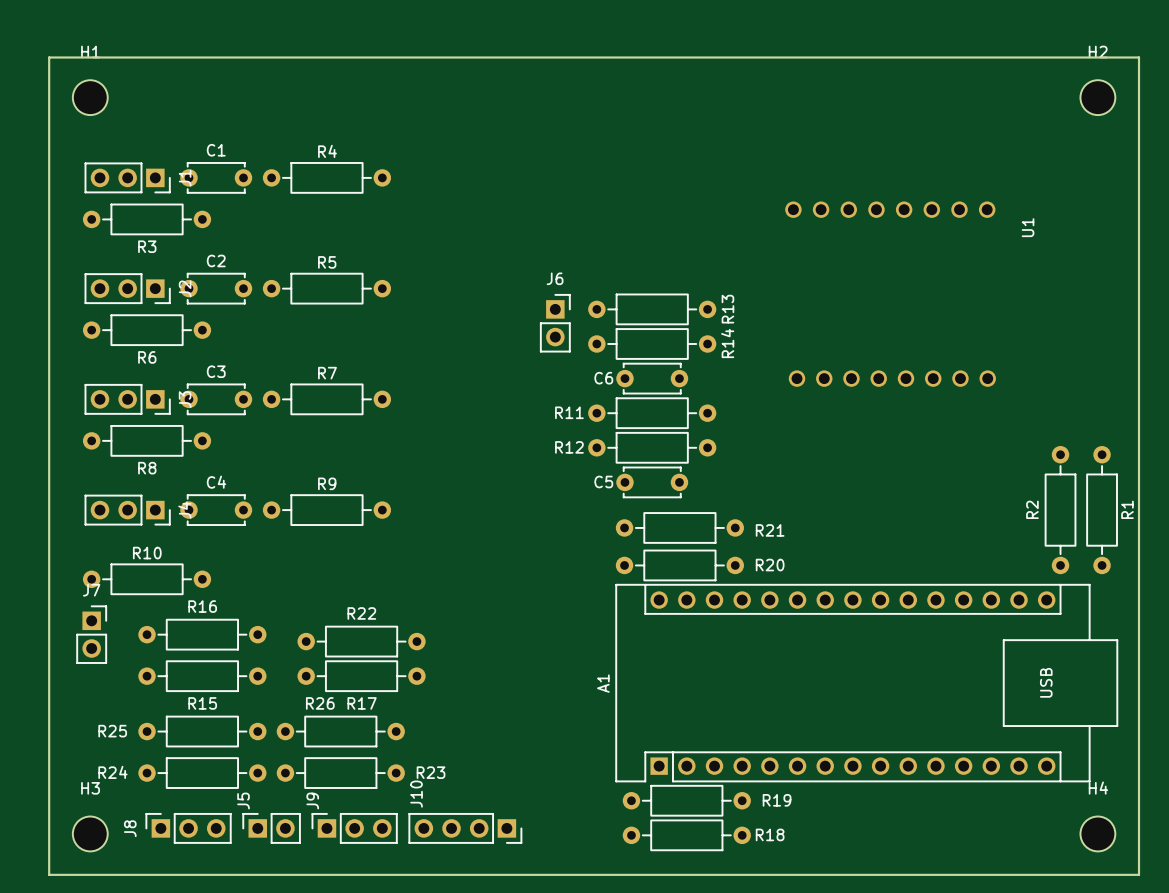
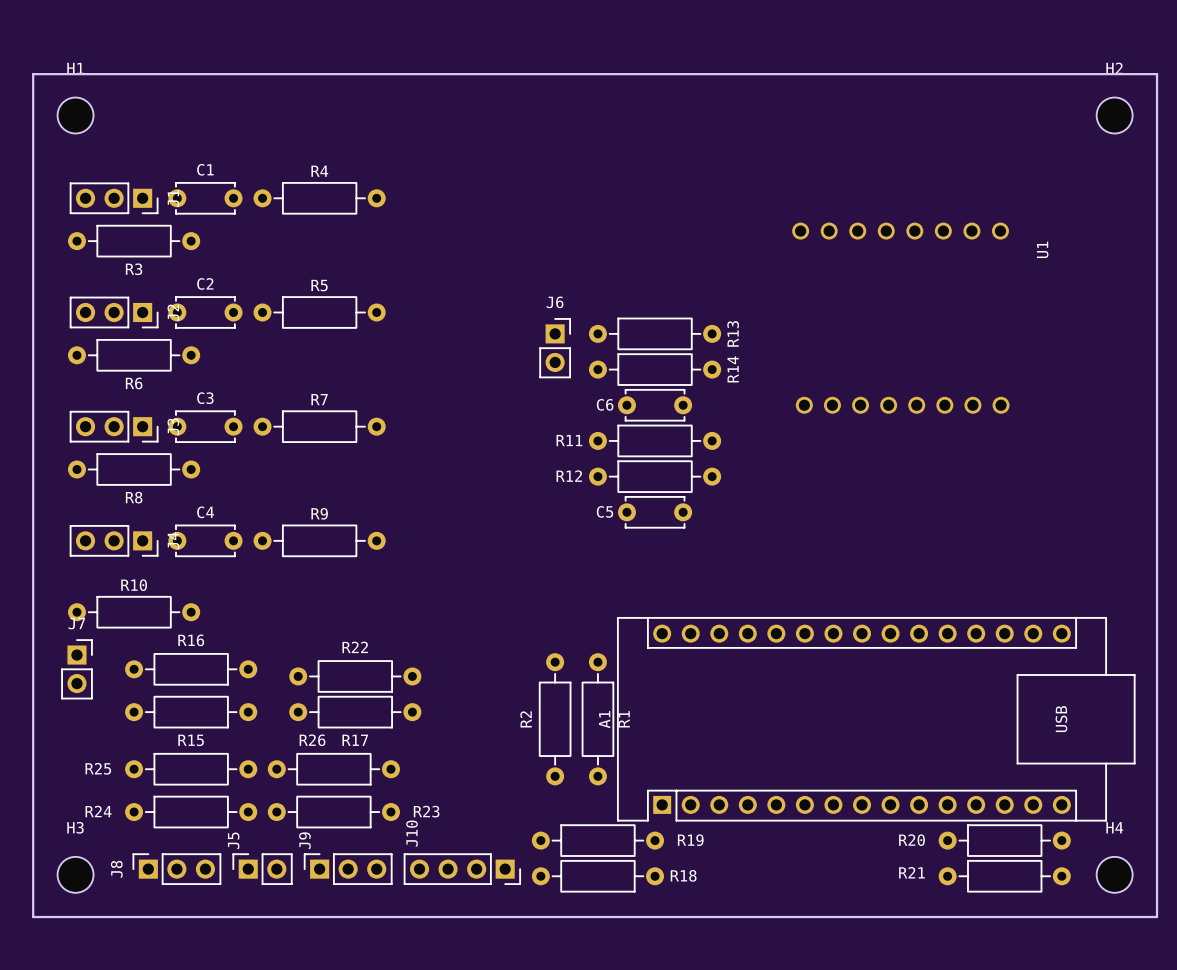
R2 position: (1060, 510) -> (555, 719)
R1 position: (1102, 510) -> (597, 719)
R21 position: (679, 527) -> (1004, 876)
R21 name position: R21 (770, 530) -> R21 (911, 872)
R20 position: (679, 565) -> (1004, 840)
R20 name position: R20 (770, 565) -> R20 (911, 840)
R19 position: (686, 800) -> (597, 840)
R18 position: (686, 835) -> (597, 876)

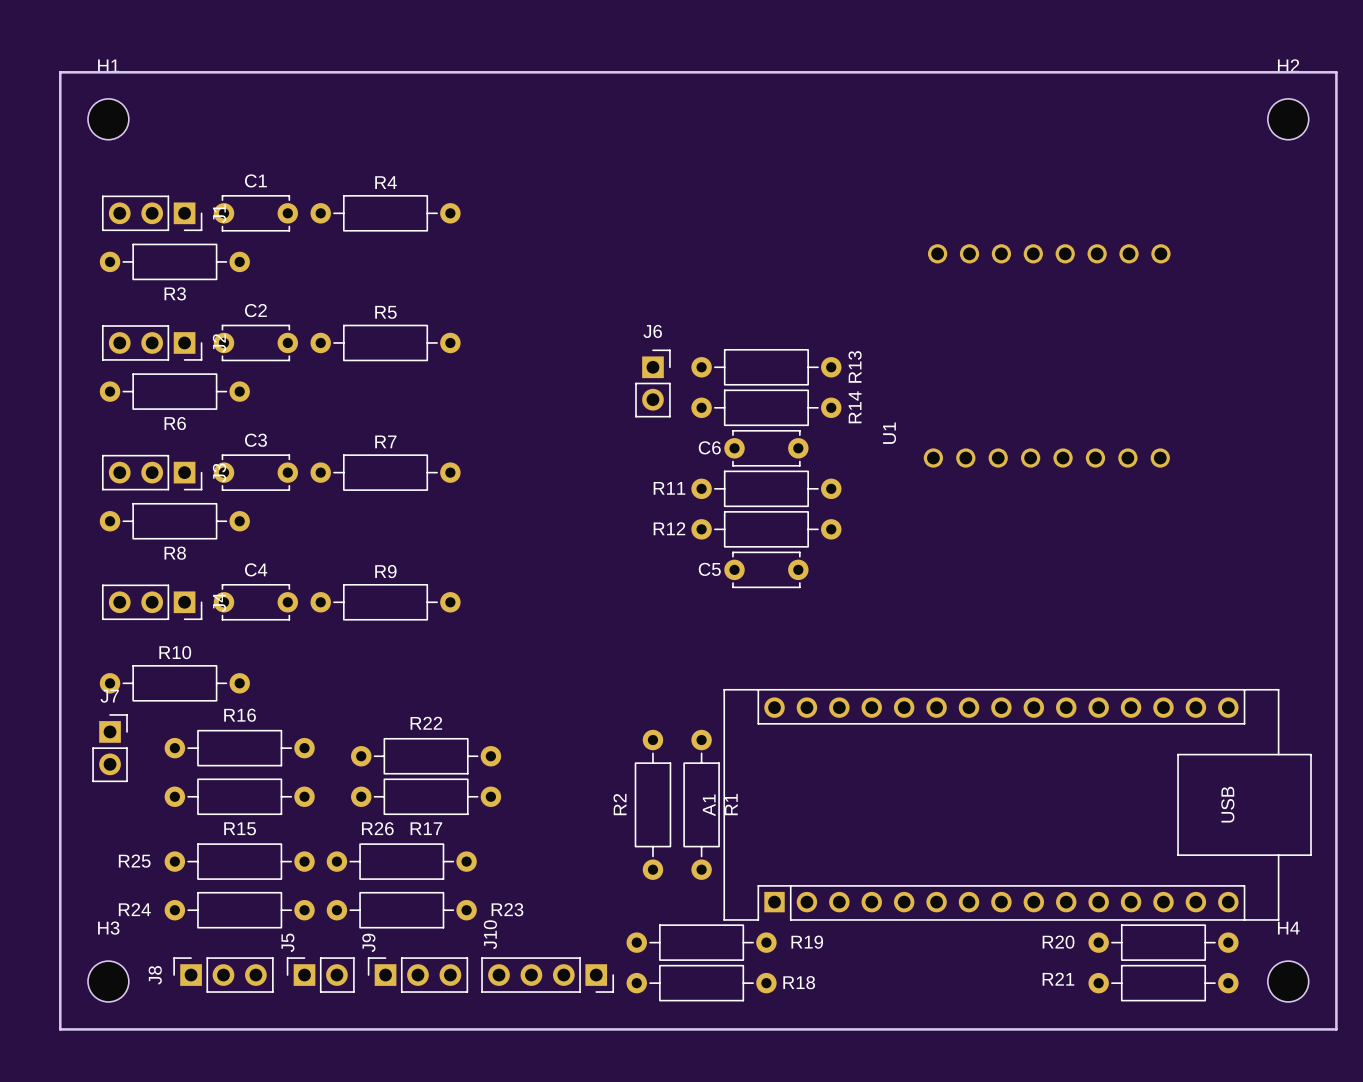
U1 footprint: [792, 222, 1010, 414] -> [923, 244, 1171, 468]
U1 name position: U1 (1042, 249) -> U1 (889, 433)

